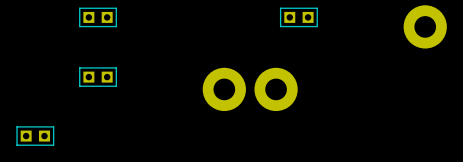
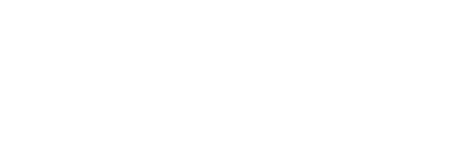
part: (98, 17) -> none
part: (298, 17) -> none
part: (425, 26) -> none
part: (98, 77) -> none
part: (224, 89) -> none
part: (276, 89) -> none
part: (35, 136) -> none

